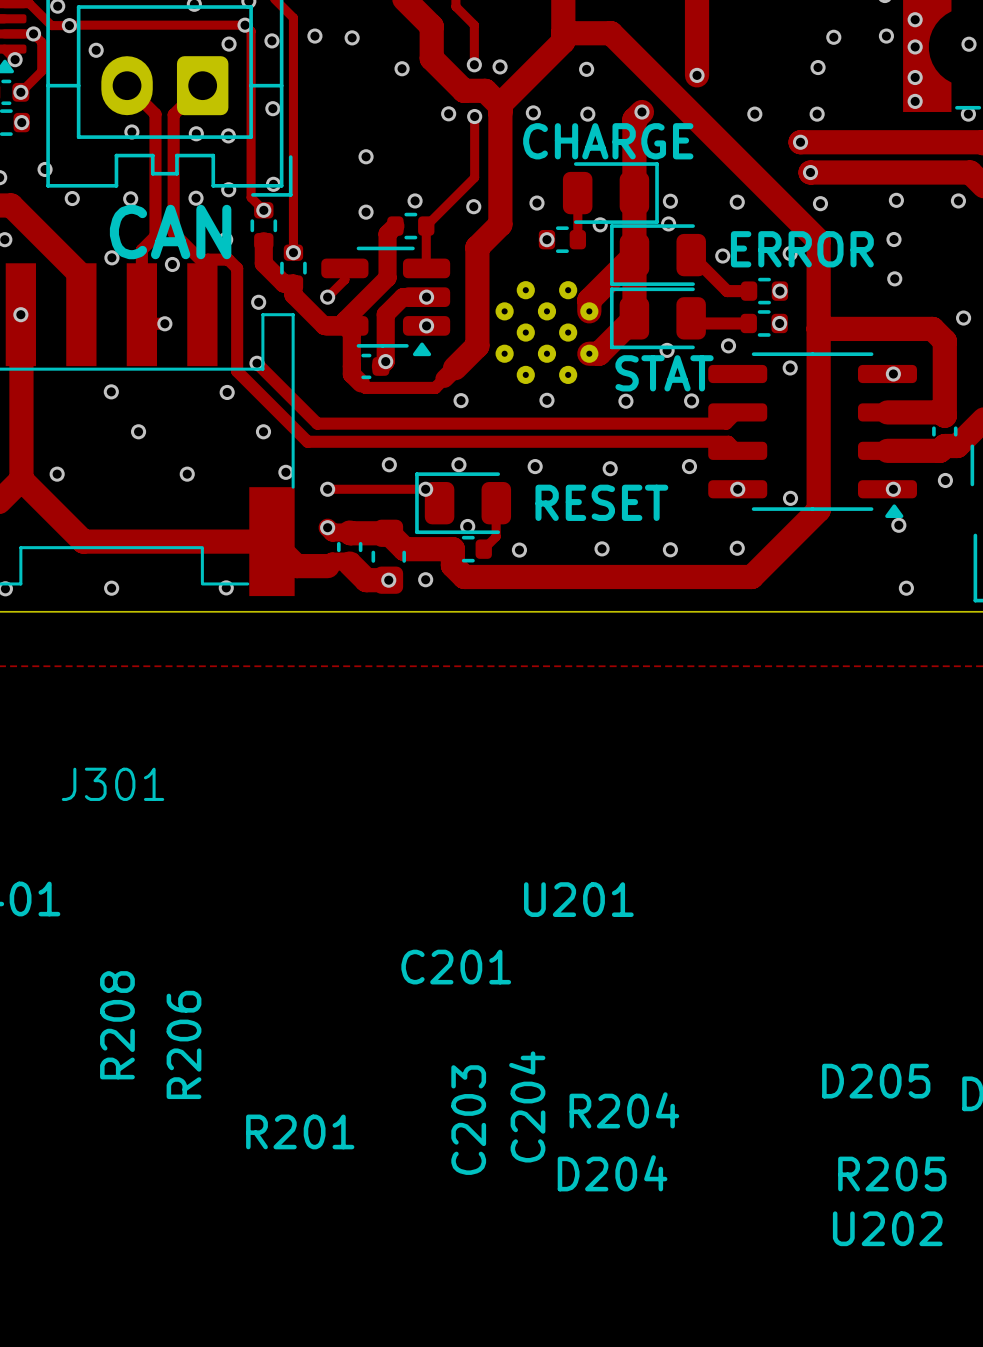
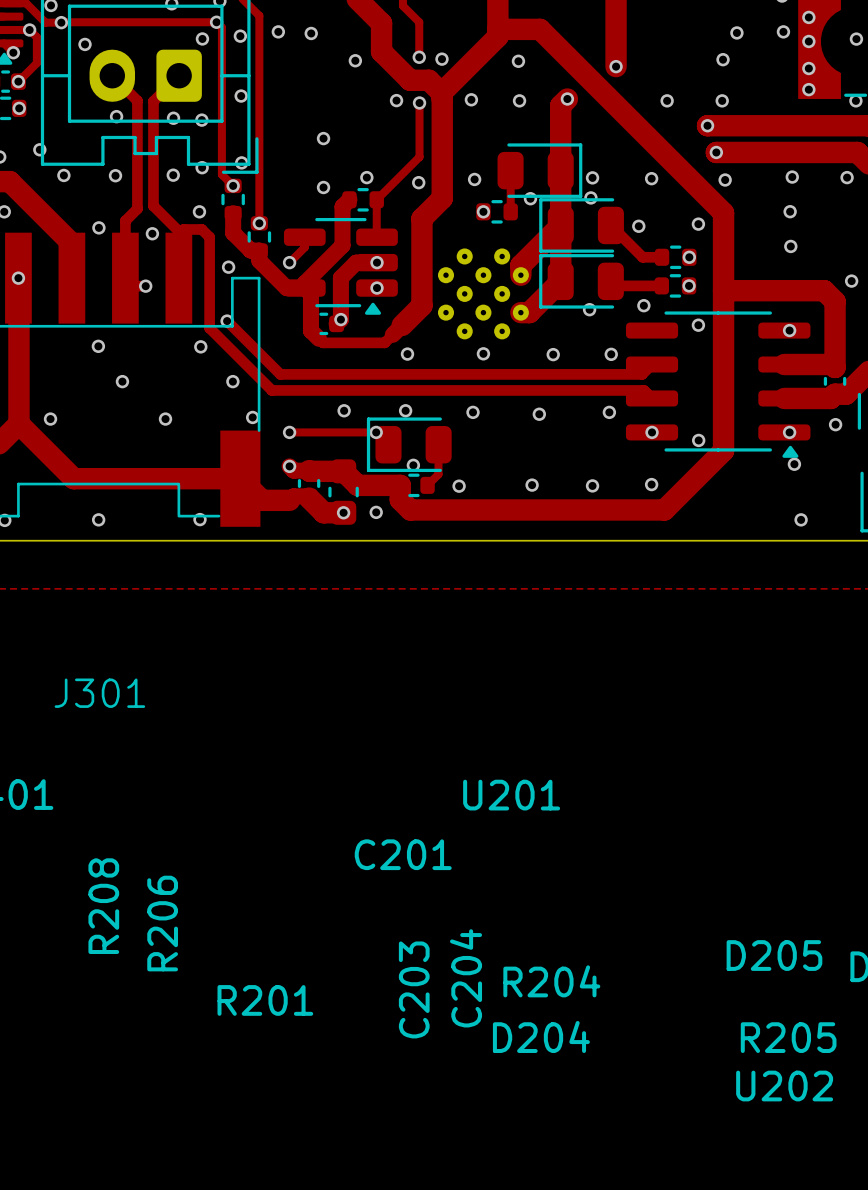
text: CHARGE (608, 141) -> none
text: CAN (170, 232) -> none
text: ERROR (802, 249) -> none
text: STAT (664, 373) -> none
text: RESET (601, 502) -> none

